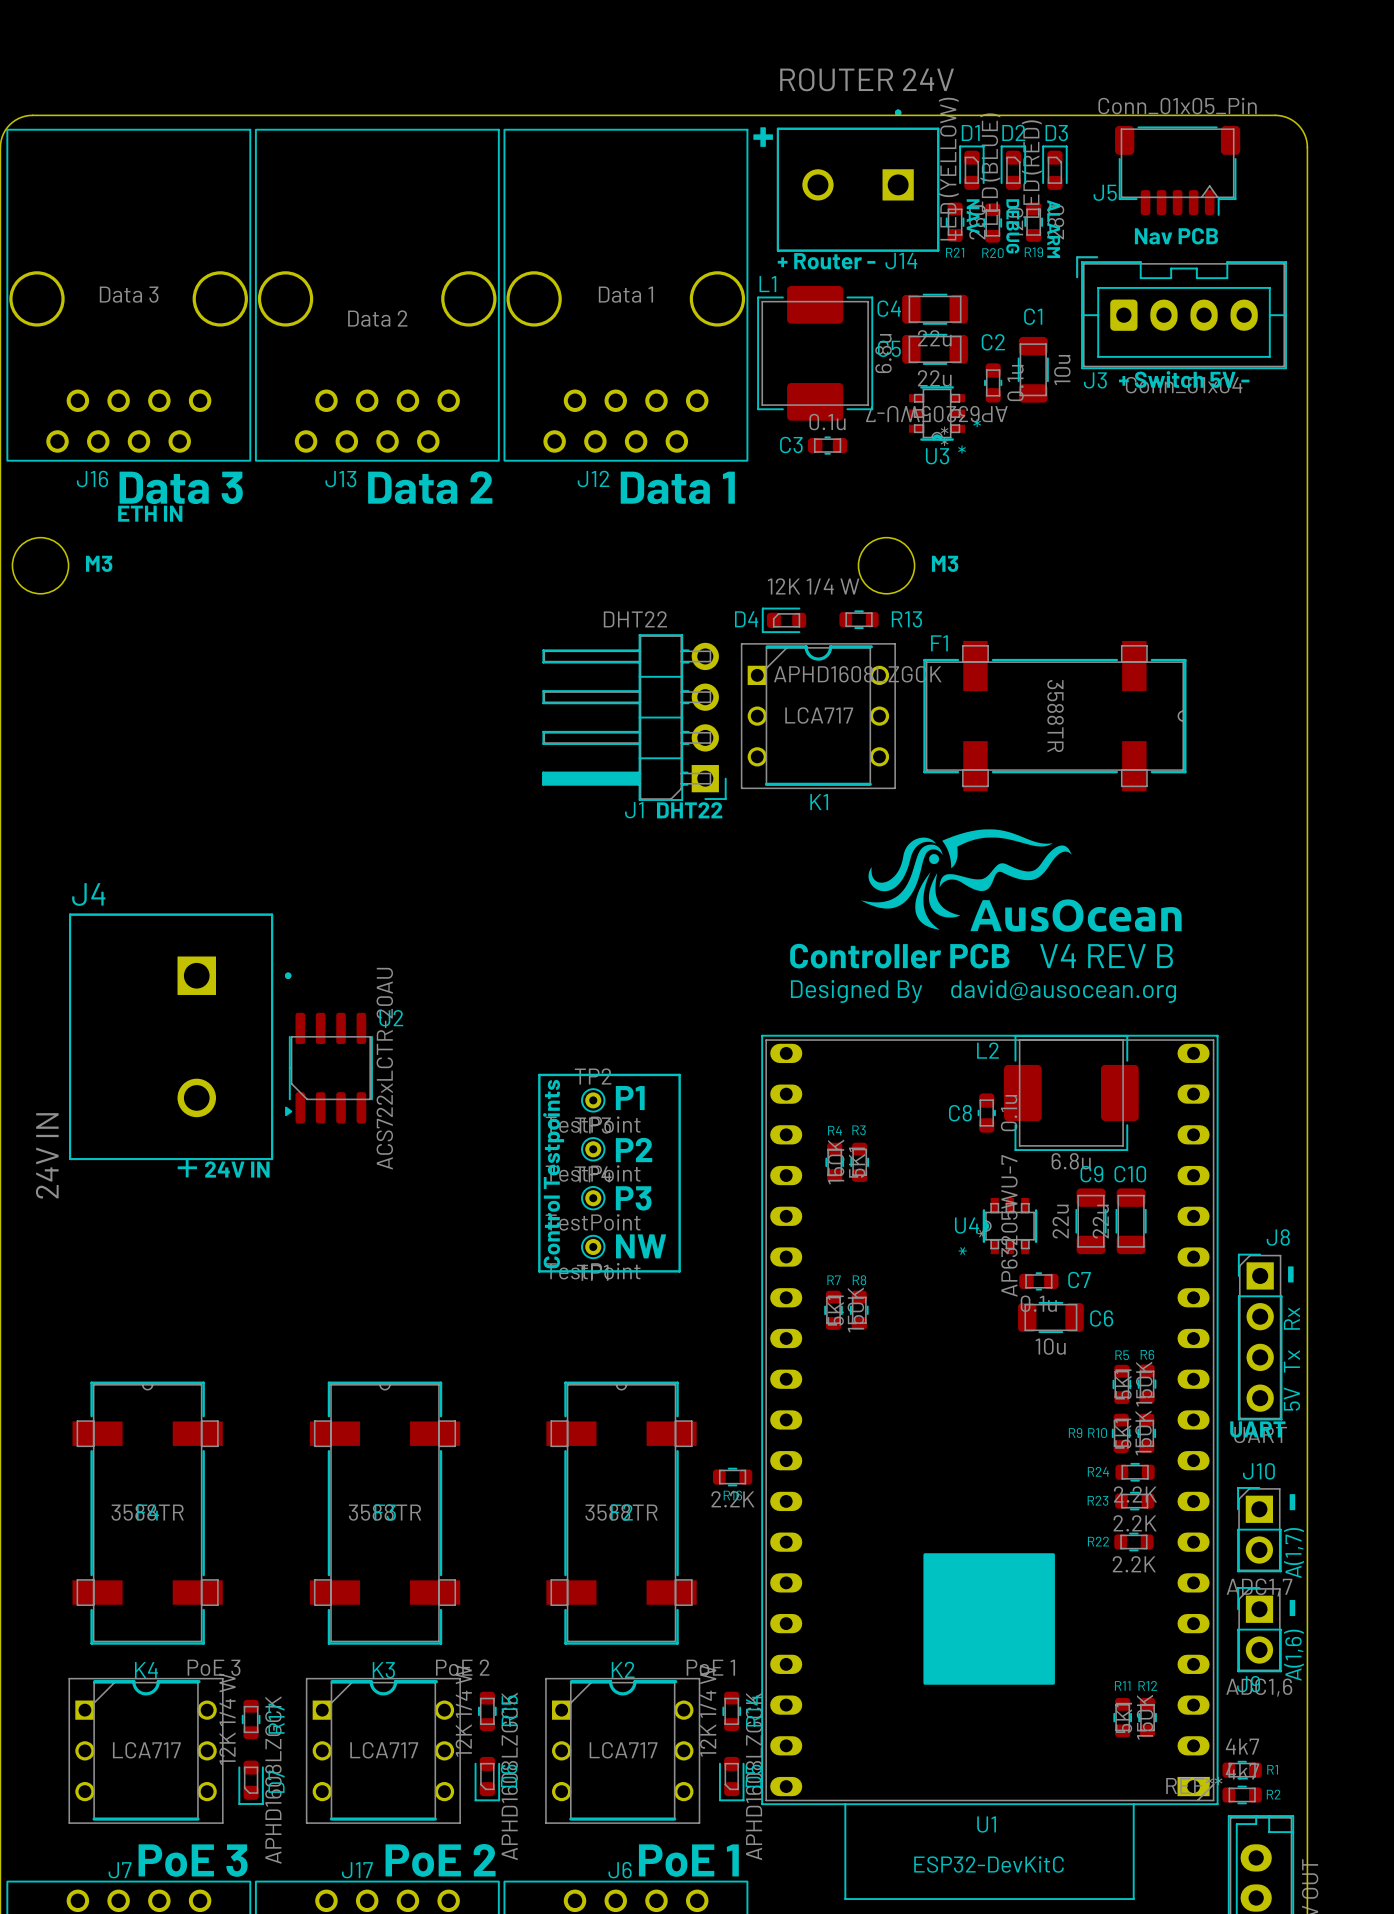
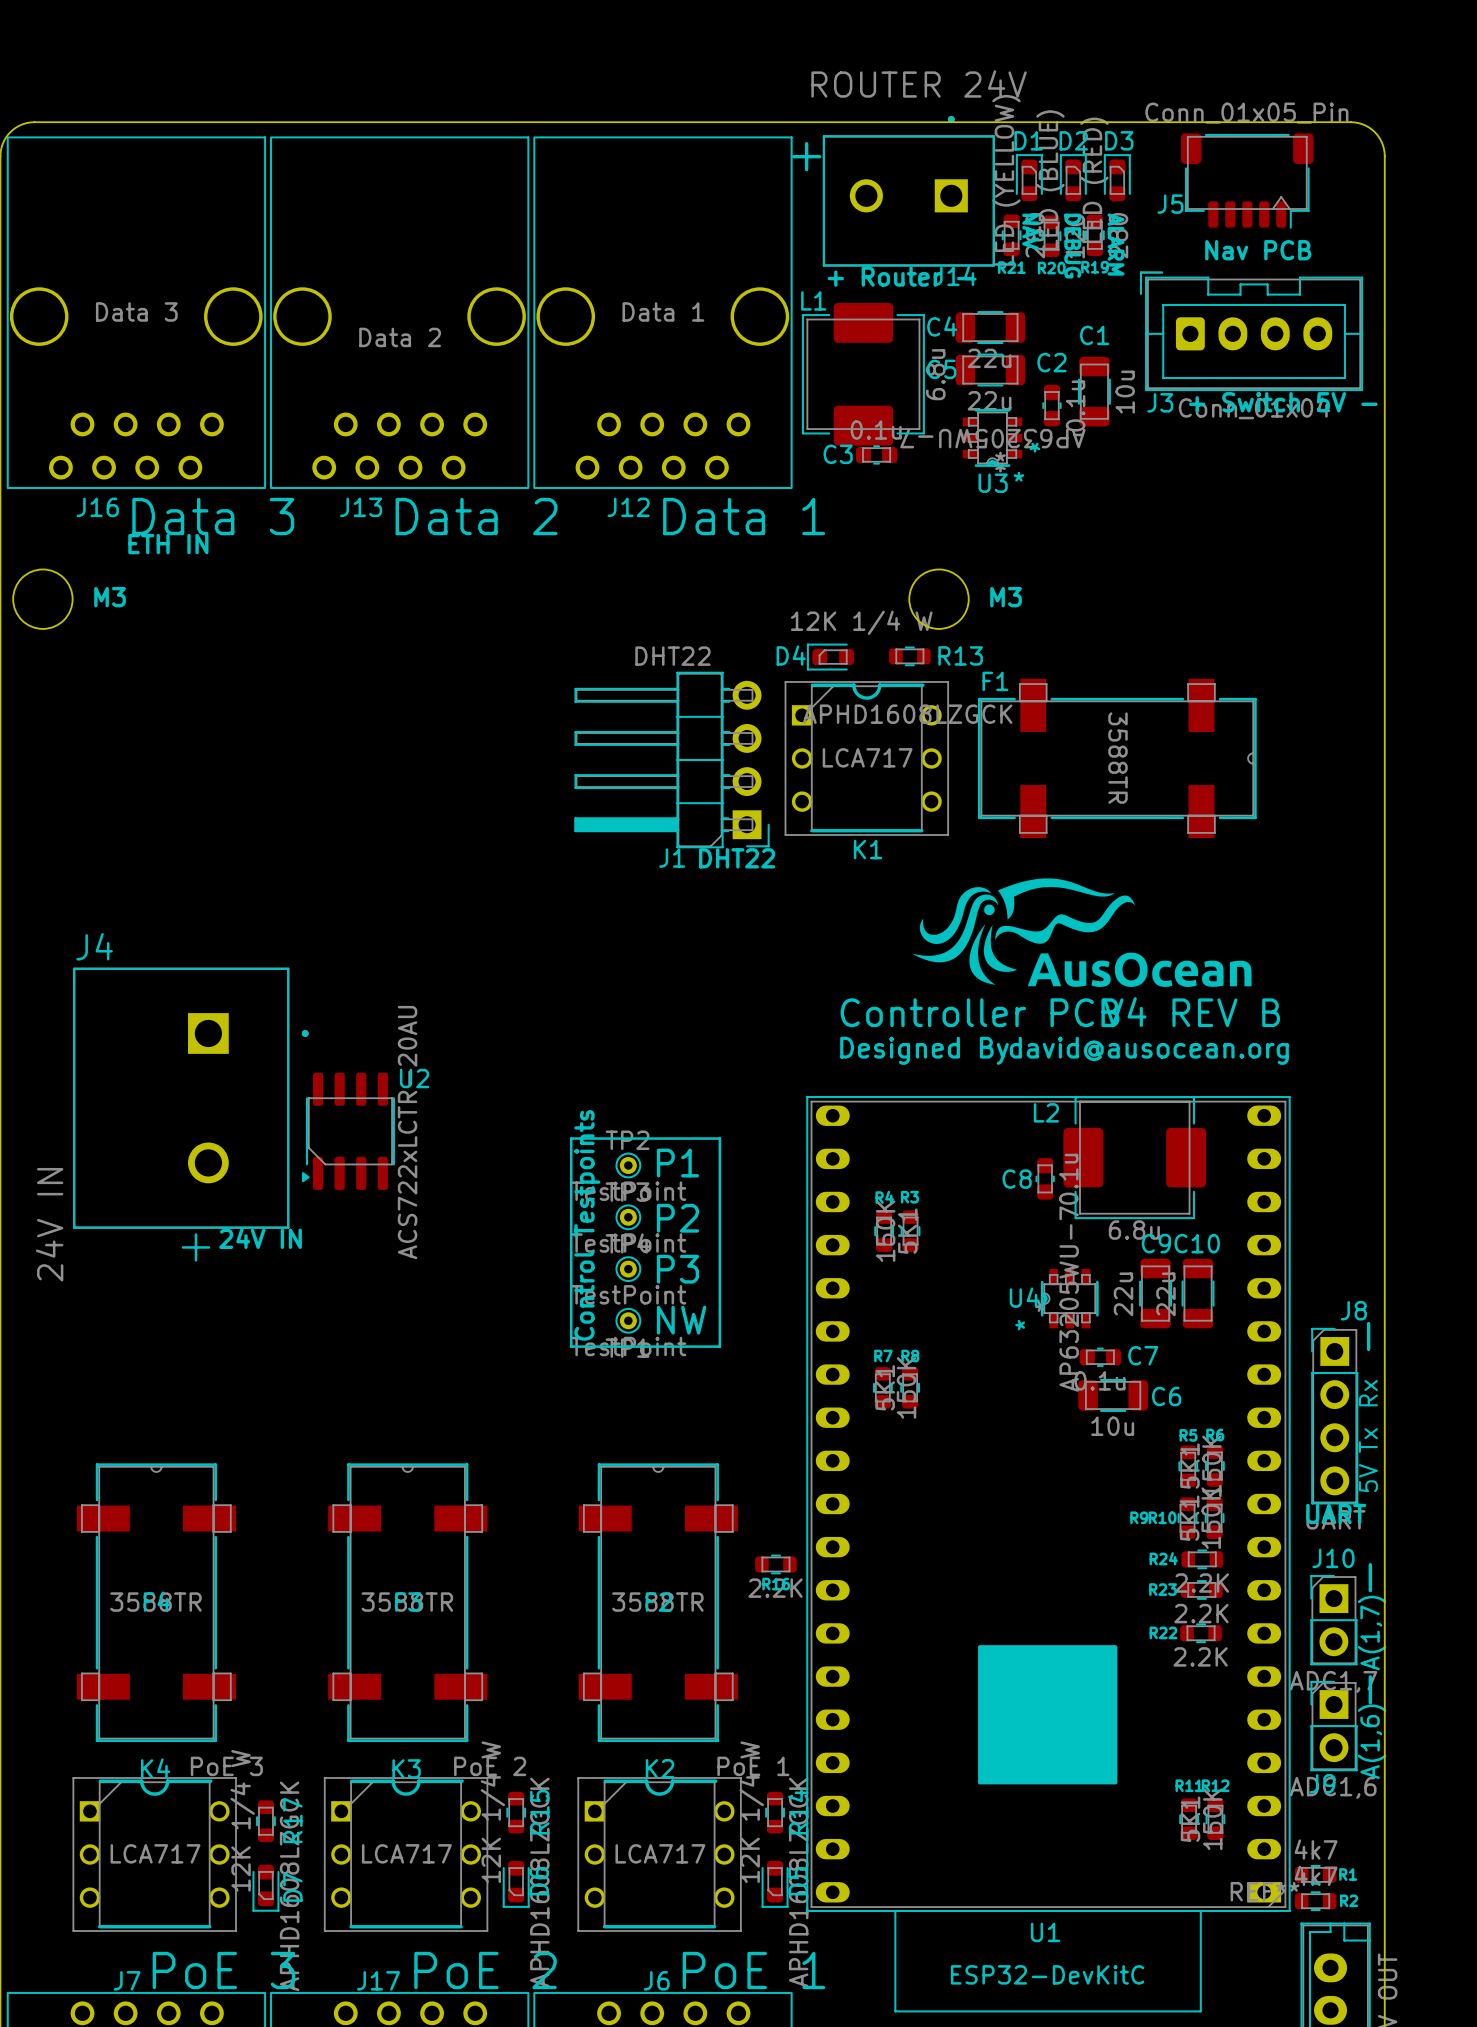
C3 position: (827, 445) -> (876, 454)

